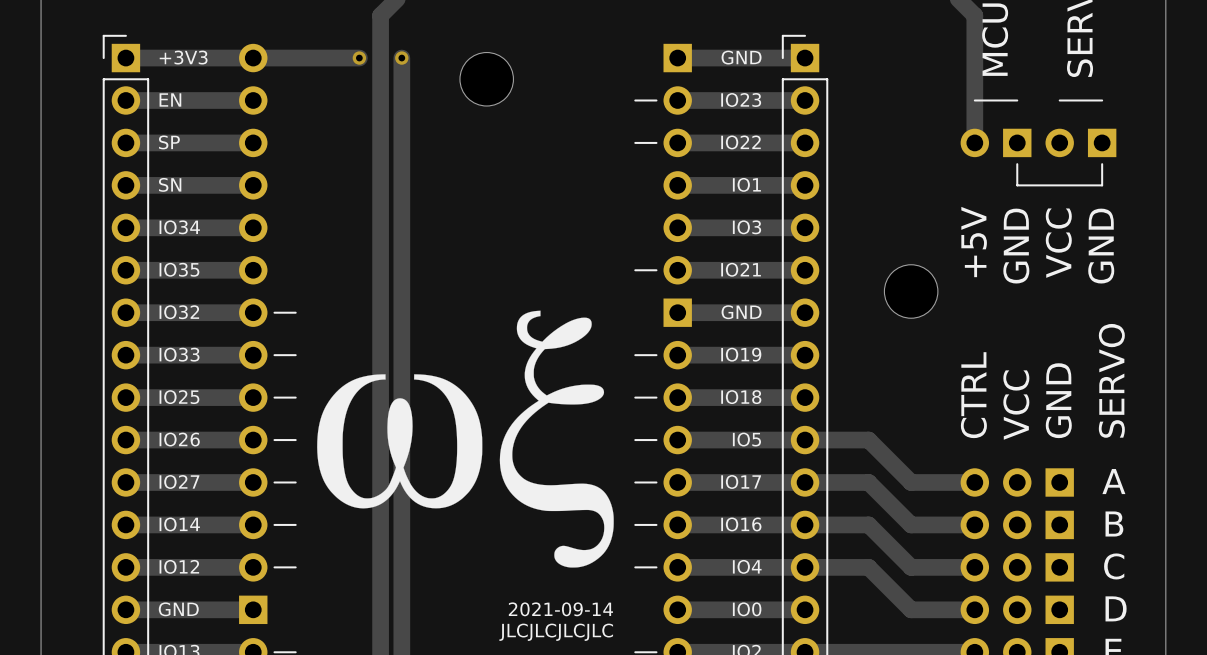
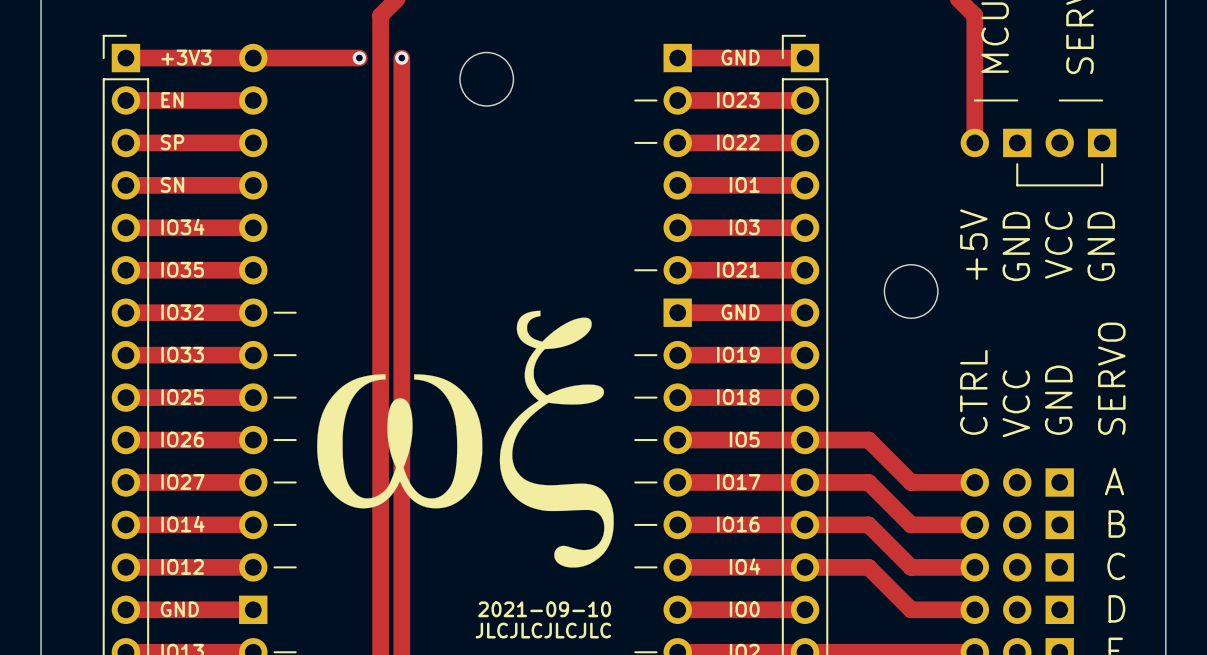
text: 2021-09-14 (560, 609) -> 2021-09-10 (544, 609)

